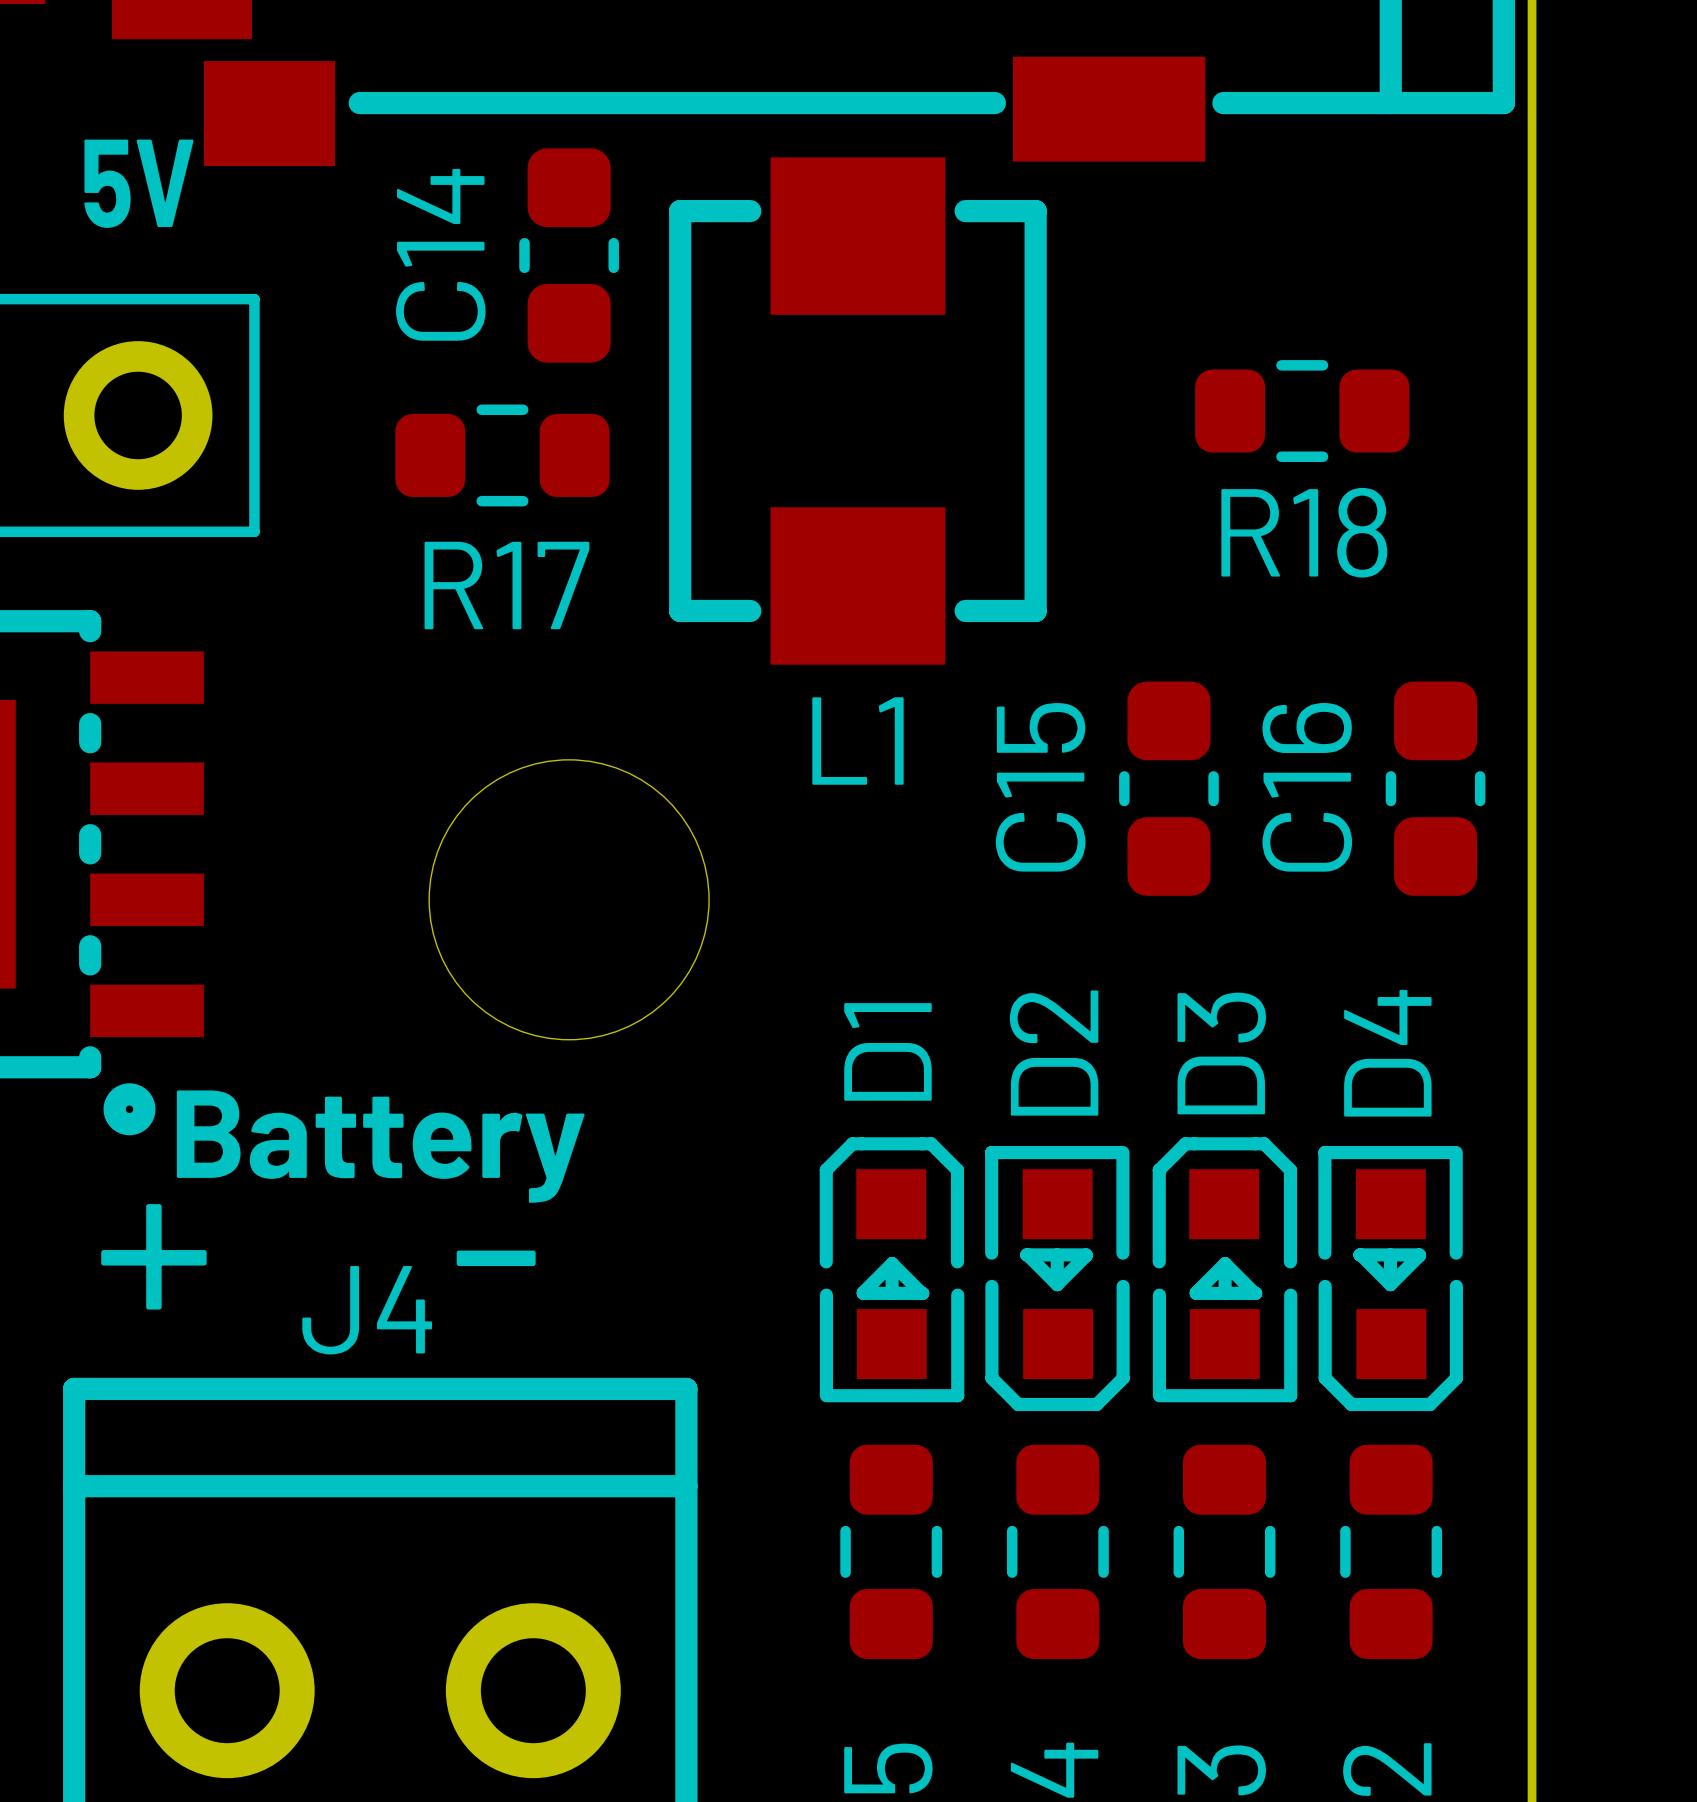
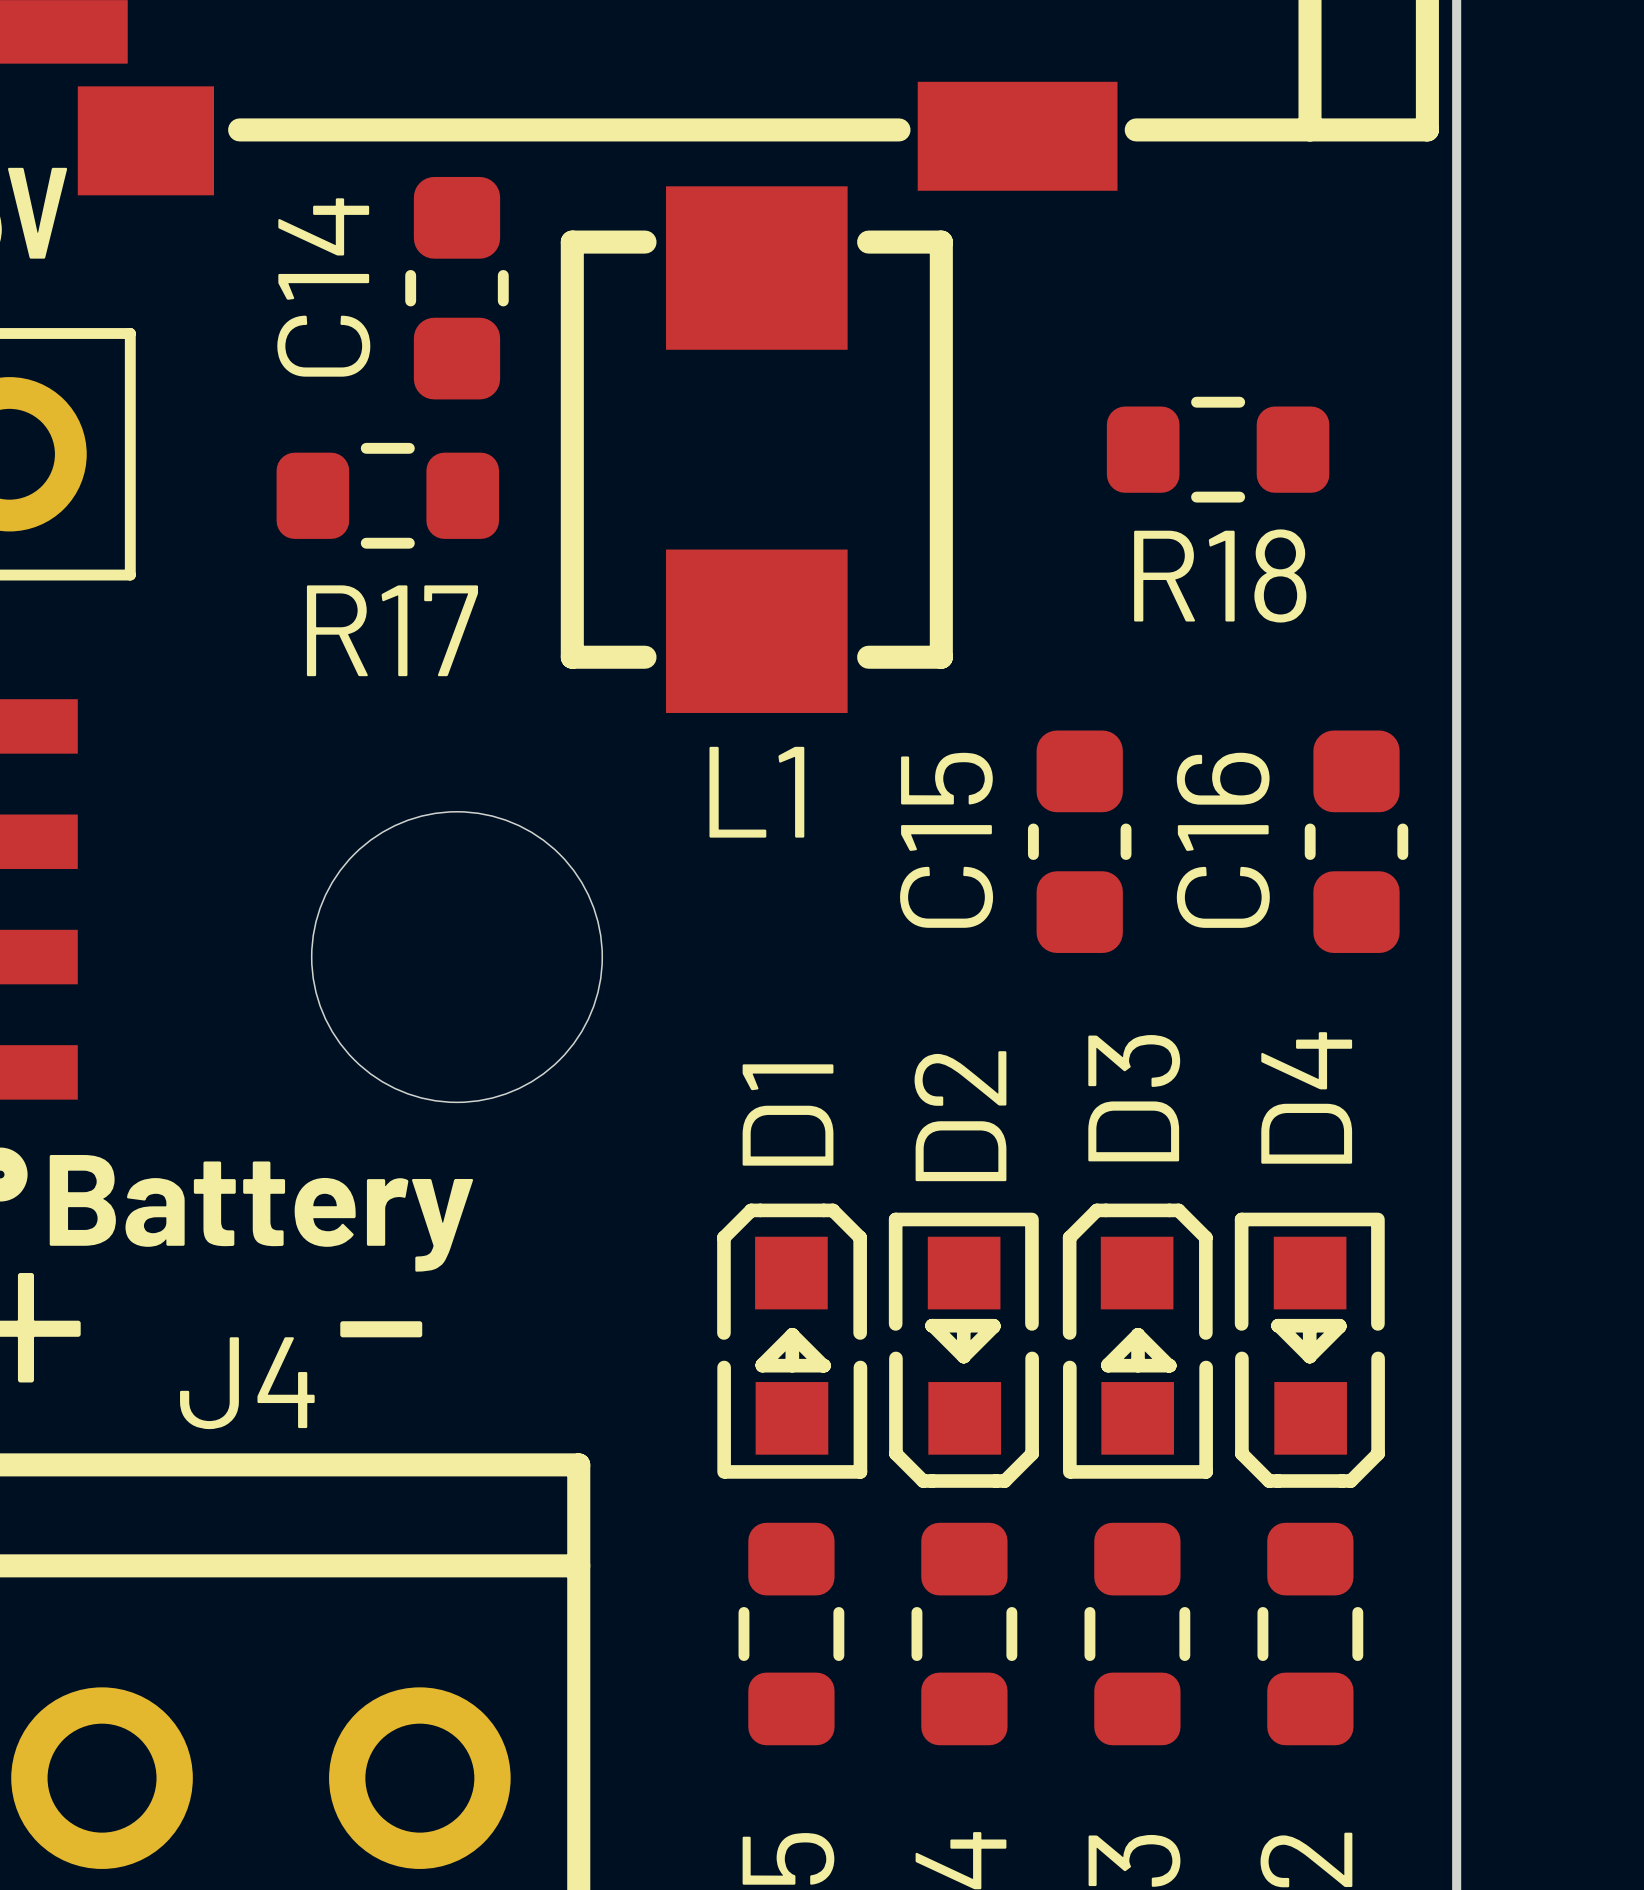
D3 name position: D3 (1221, 1053) -> D3 (1134, 1098)
D4 name position: D4 (1387, 1053) -> D4 (1306, 1097)

